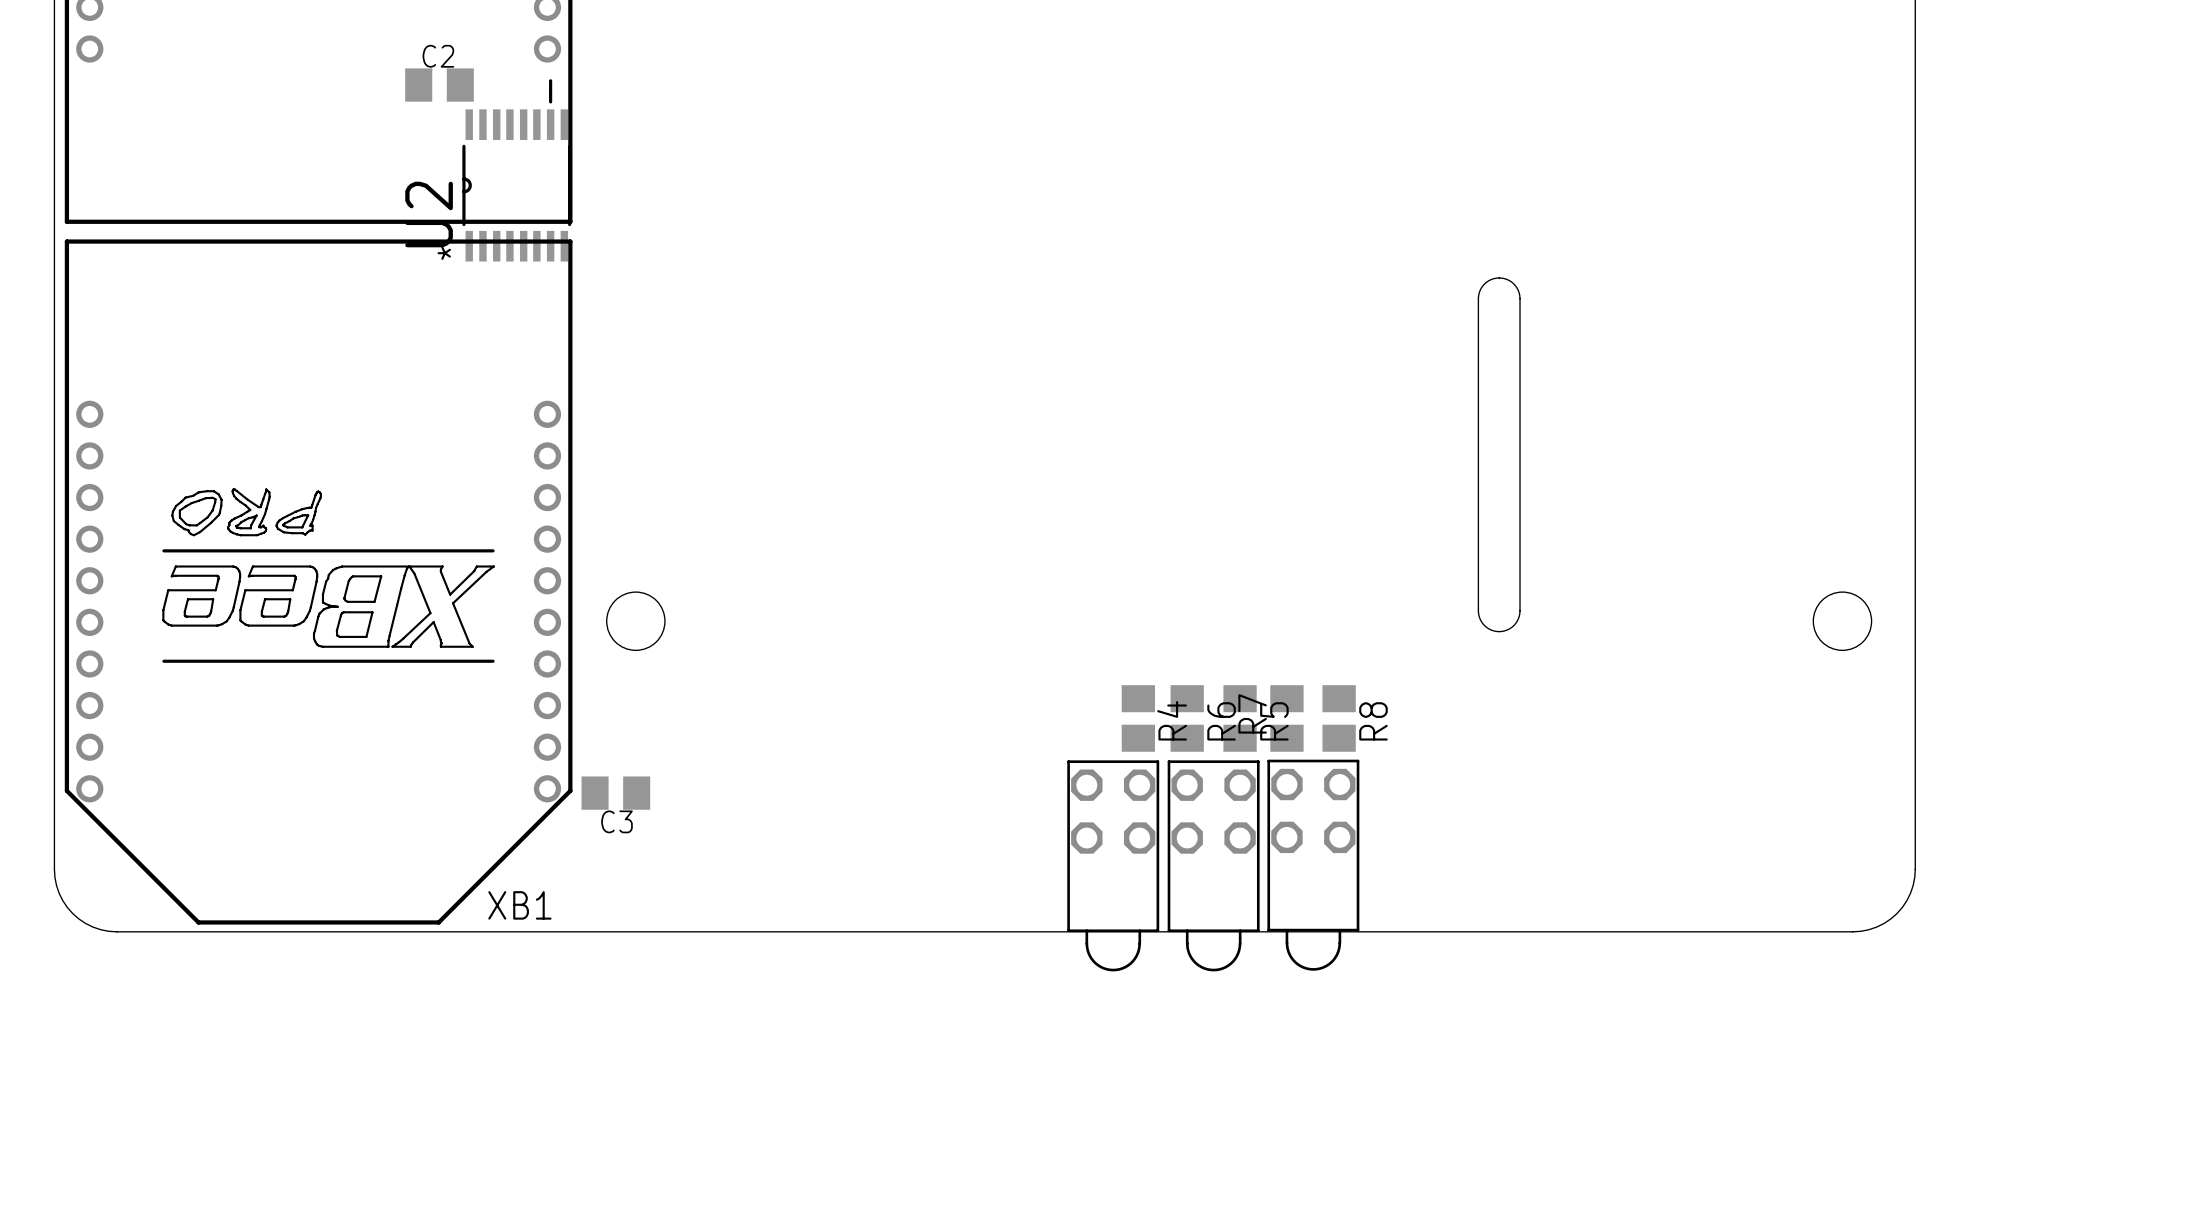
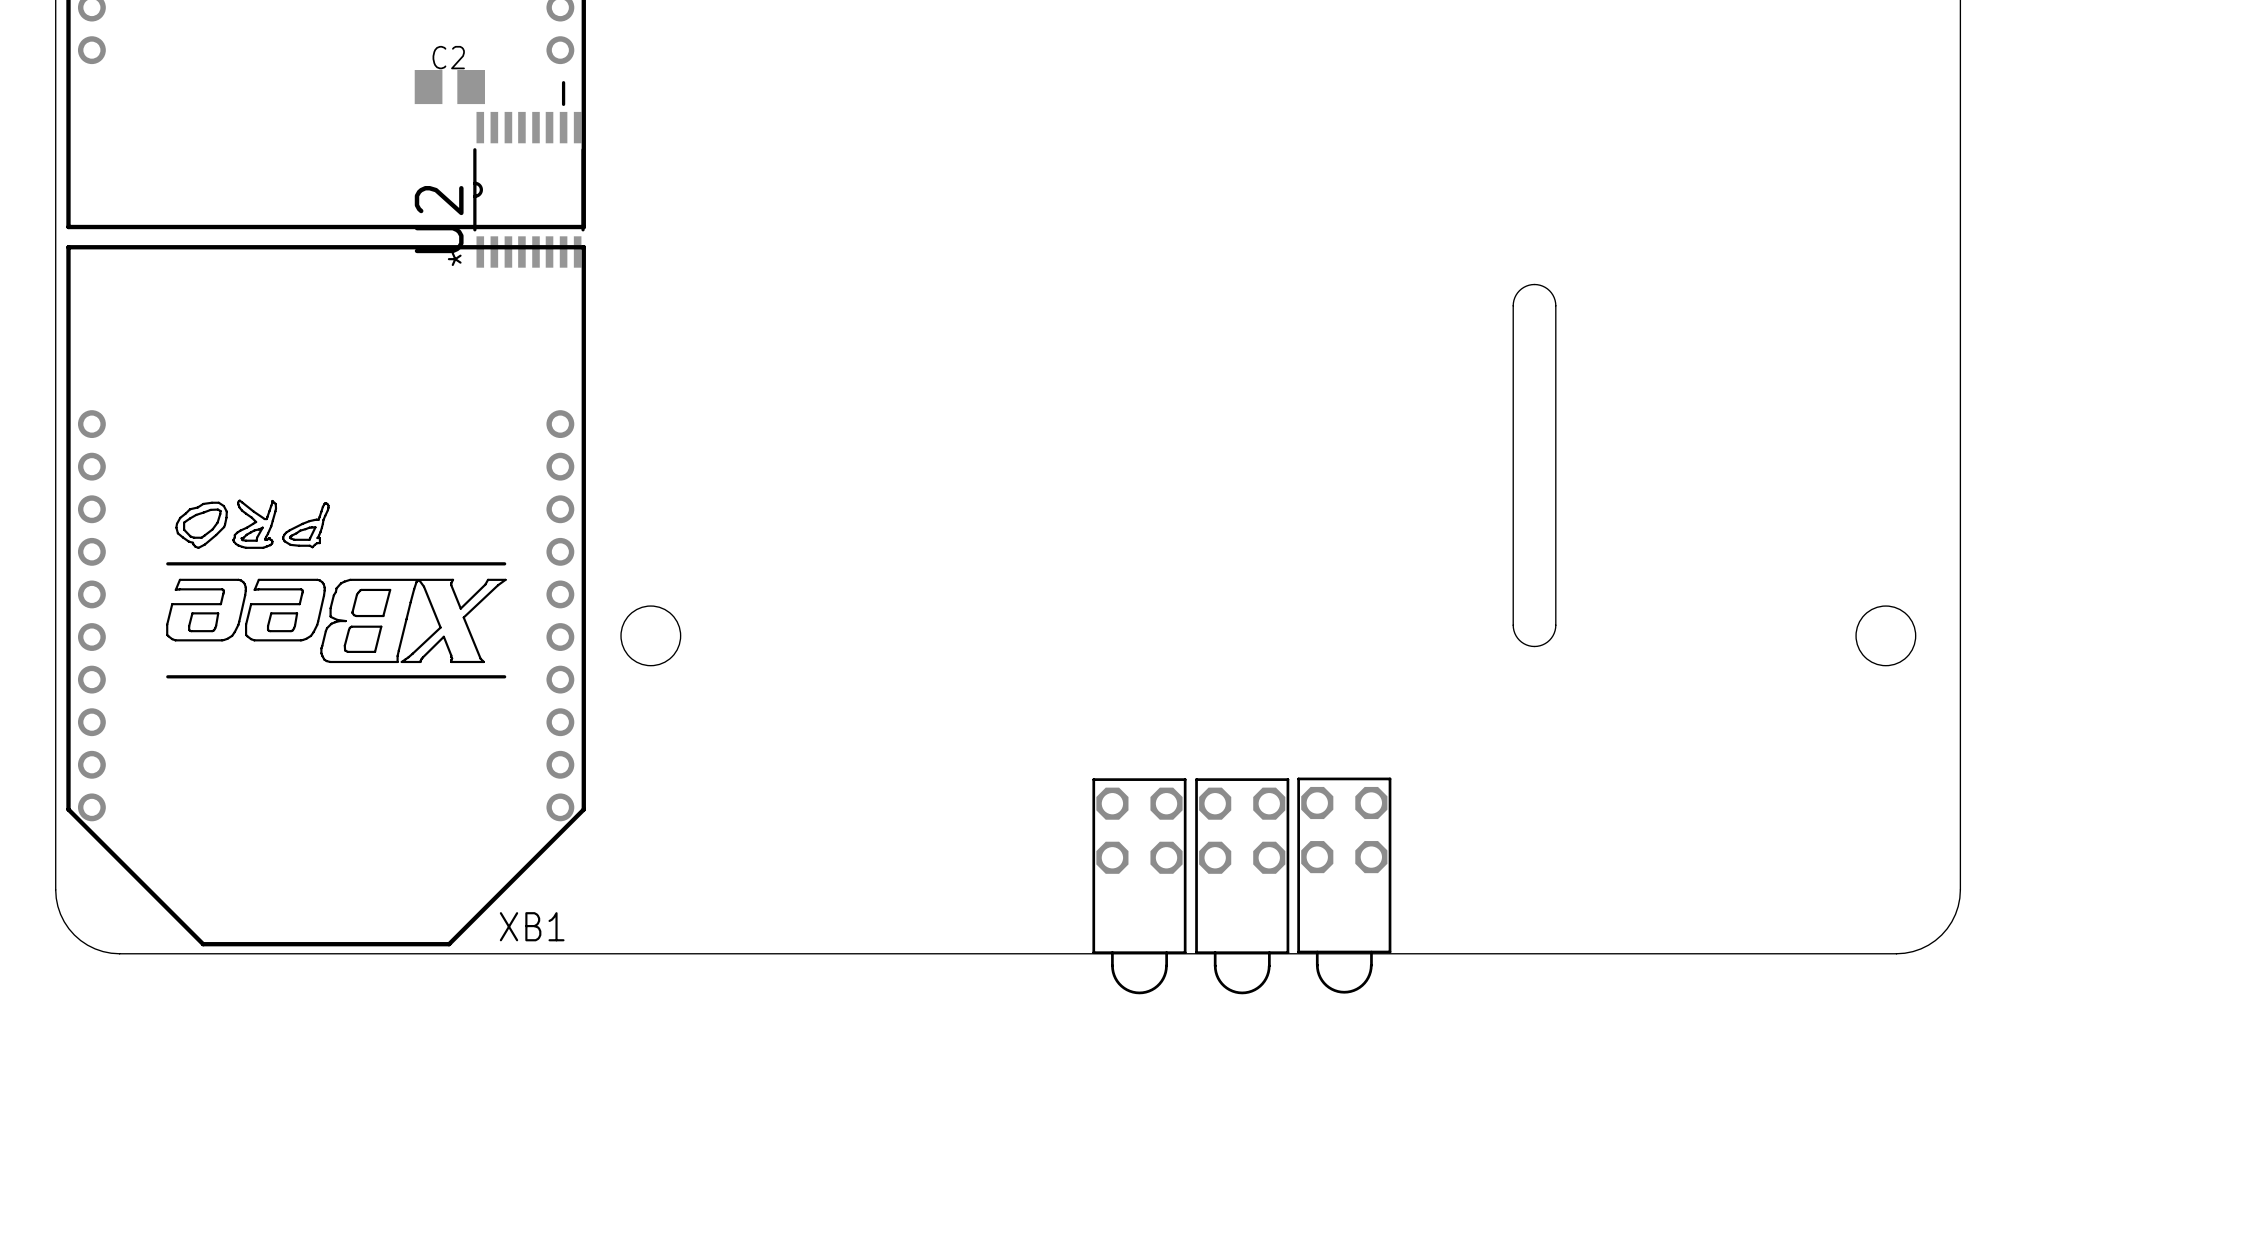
R4: (1138, 718) -> none
R6: (1187, 718) -> none
R5: (1240, 718) -> none
R7: (1286, 718) -> none
R8: (1339, 718) -> none
C3: (615, 793) -> none

